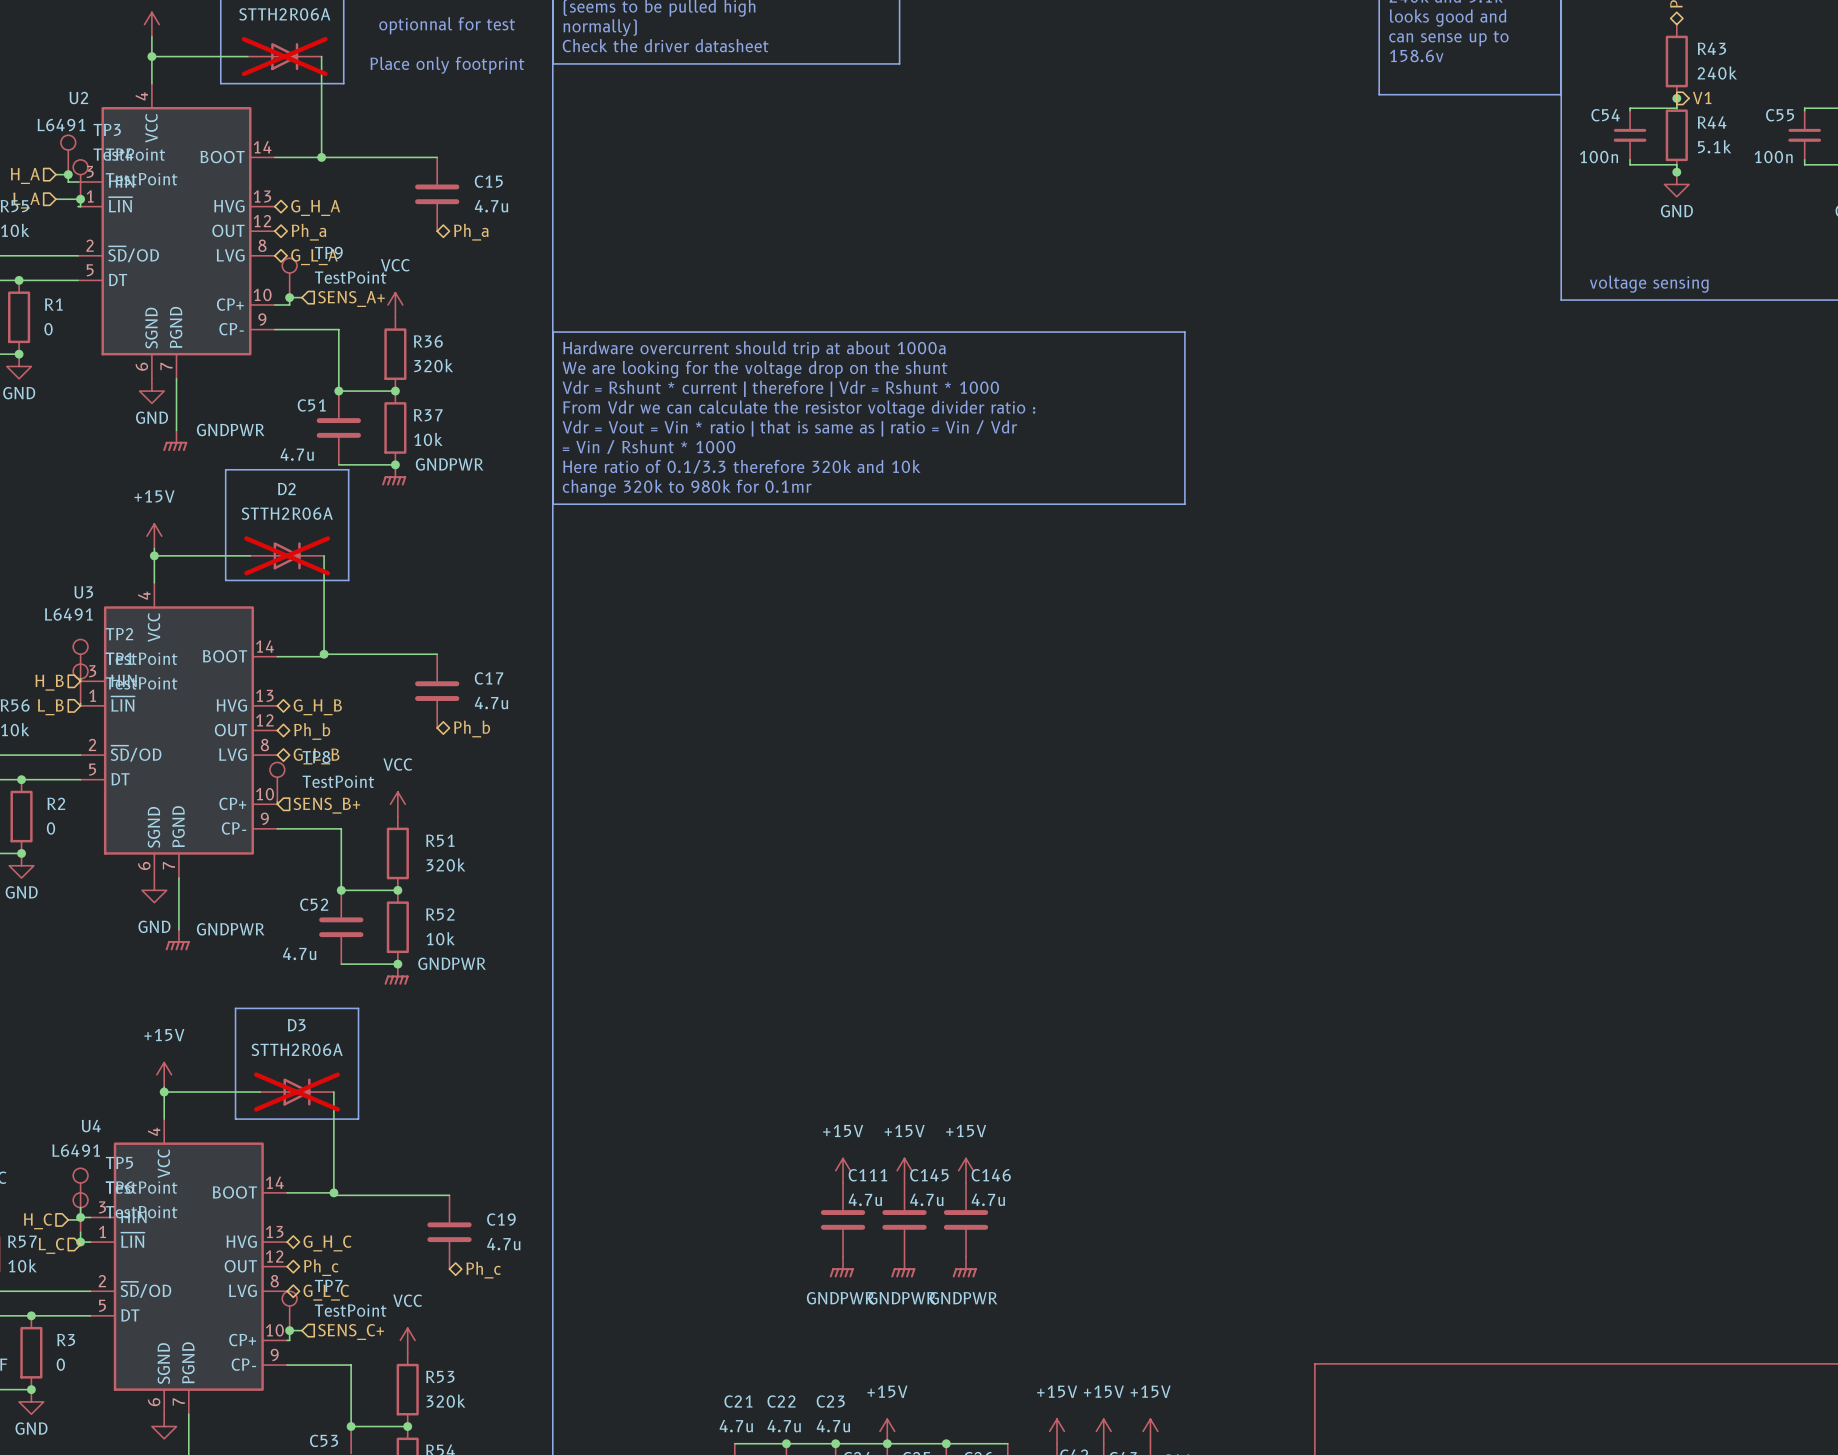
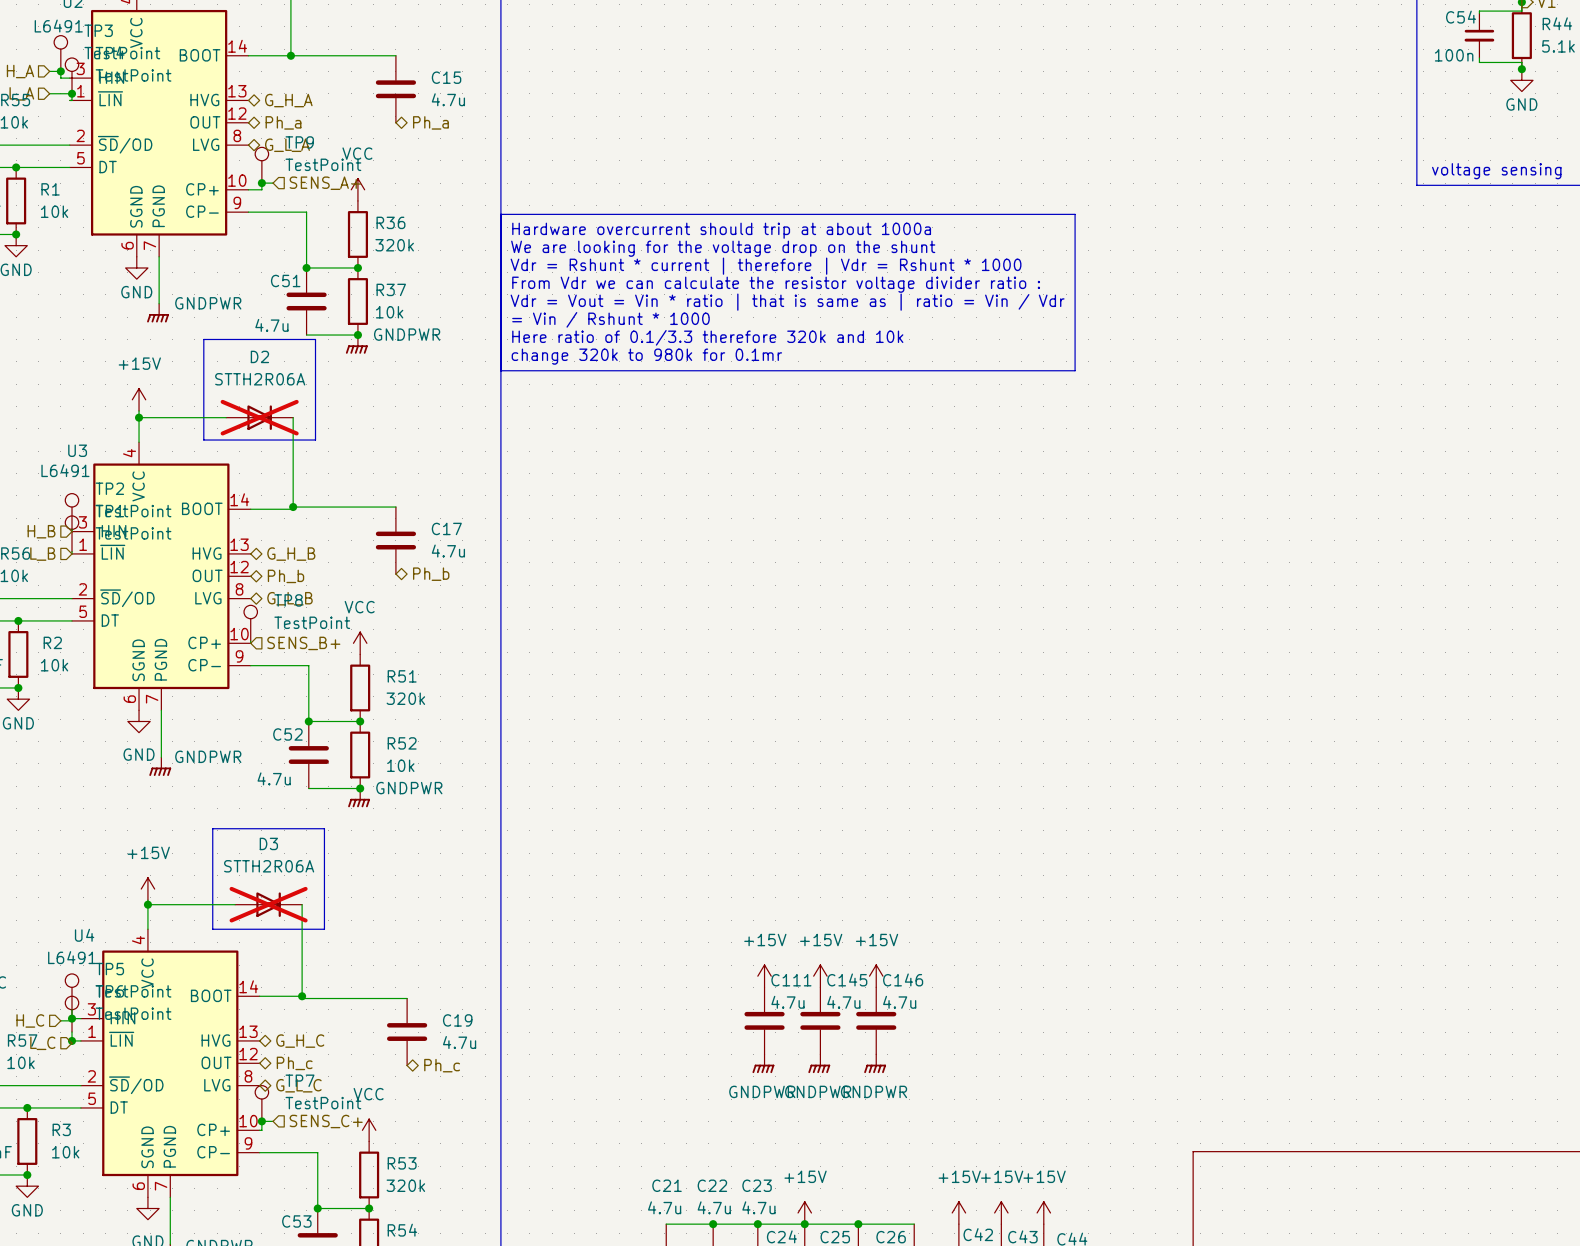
R1 value: 0 (48, 329) -> 10k (54, 211)
R2 value: 0 (51, 828) -> 10k (54, 665)
R3 value: 0 (60, 1364) -> 10k (65, 1152)

